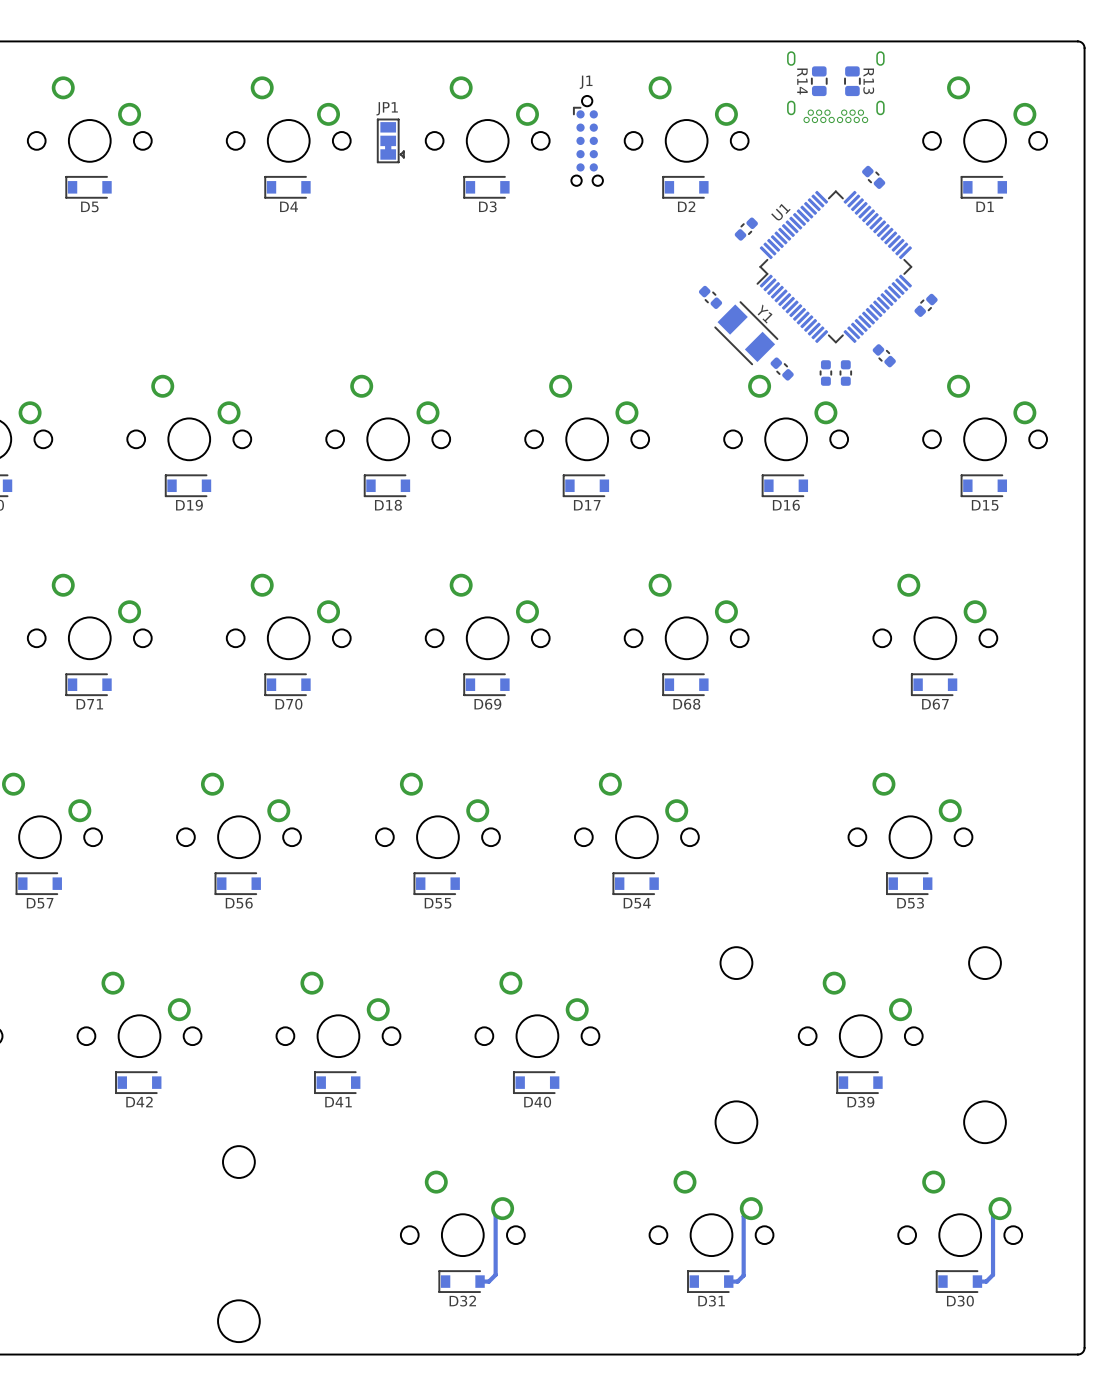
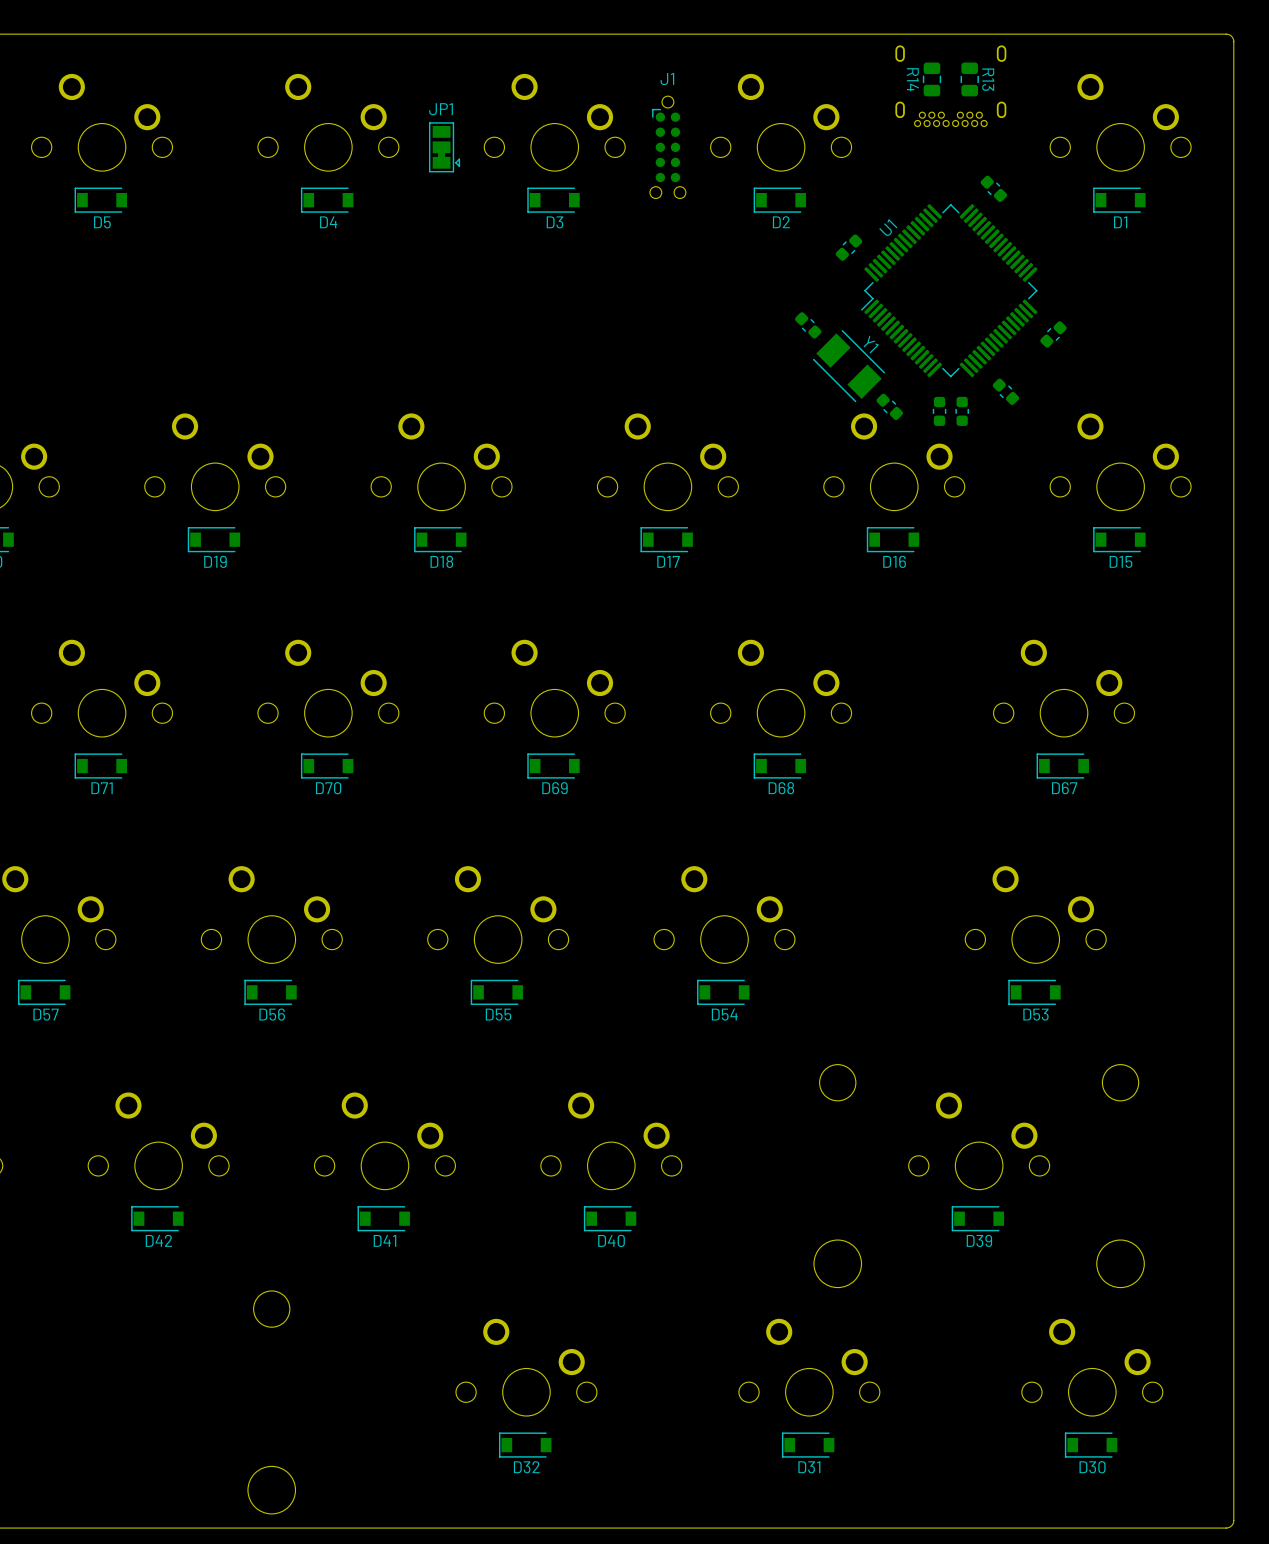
track: (502, 1208) (495, 1215) (495, 1274) (488, 1281) (480, 1281) -> none
track: (751, 1208) (743, 1216) (743, 1275) (737, 1281) (728, 1281) -> none
track: (1000, 1208) (993, 1215) (993, 1274) (986, 1281) (977, 1281) -> none

